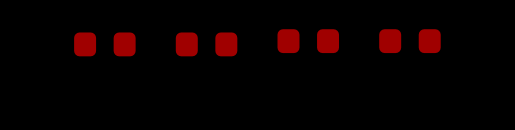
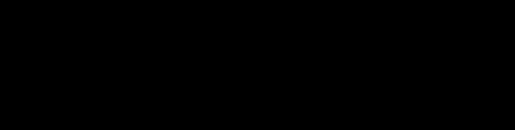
part: (308, 41) -> none
part: (409, 41) -> none
part: (104, 44) -> none
part: (206, 44) -> none

